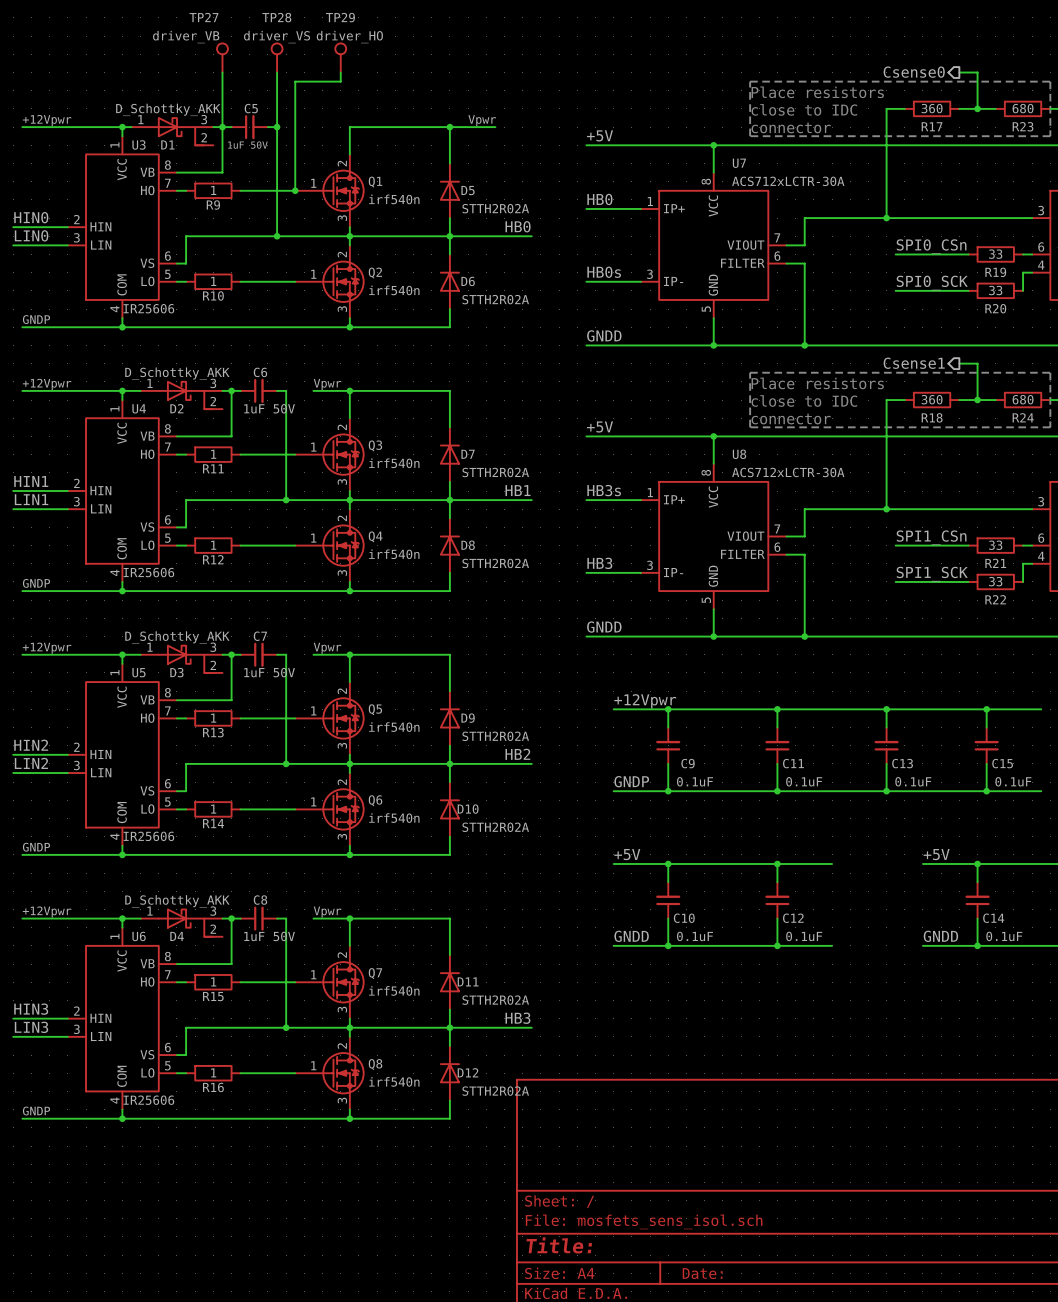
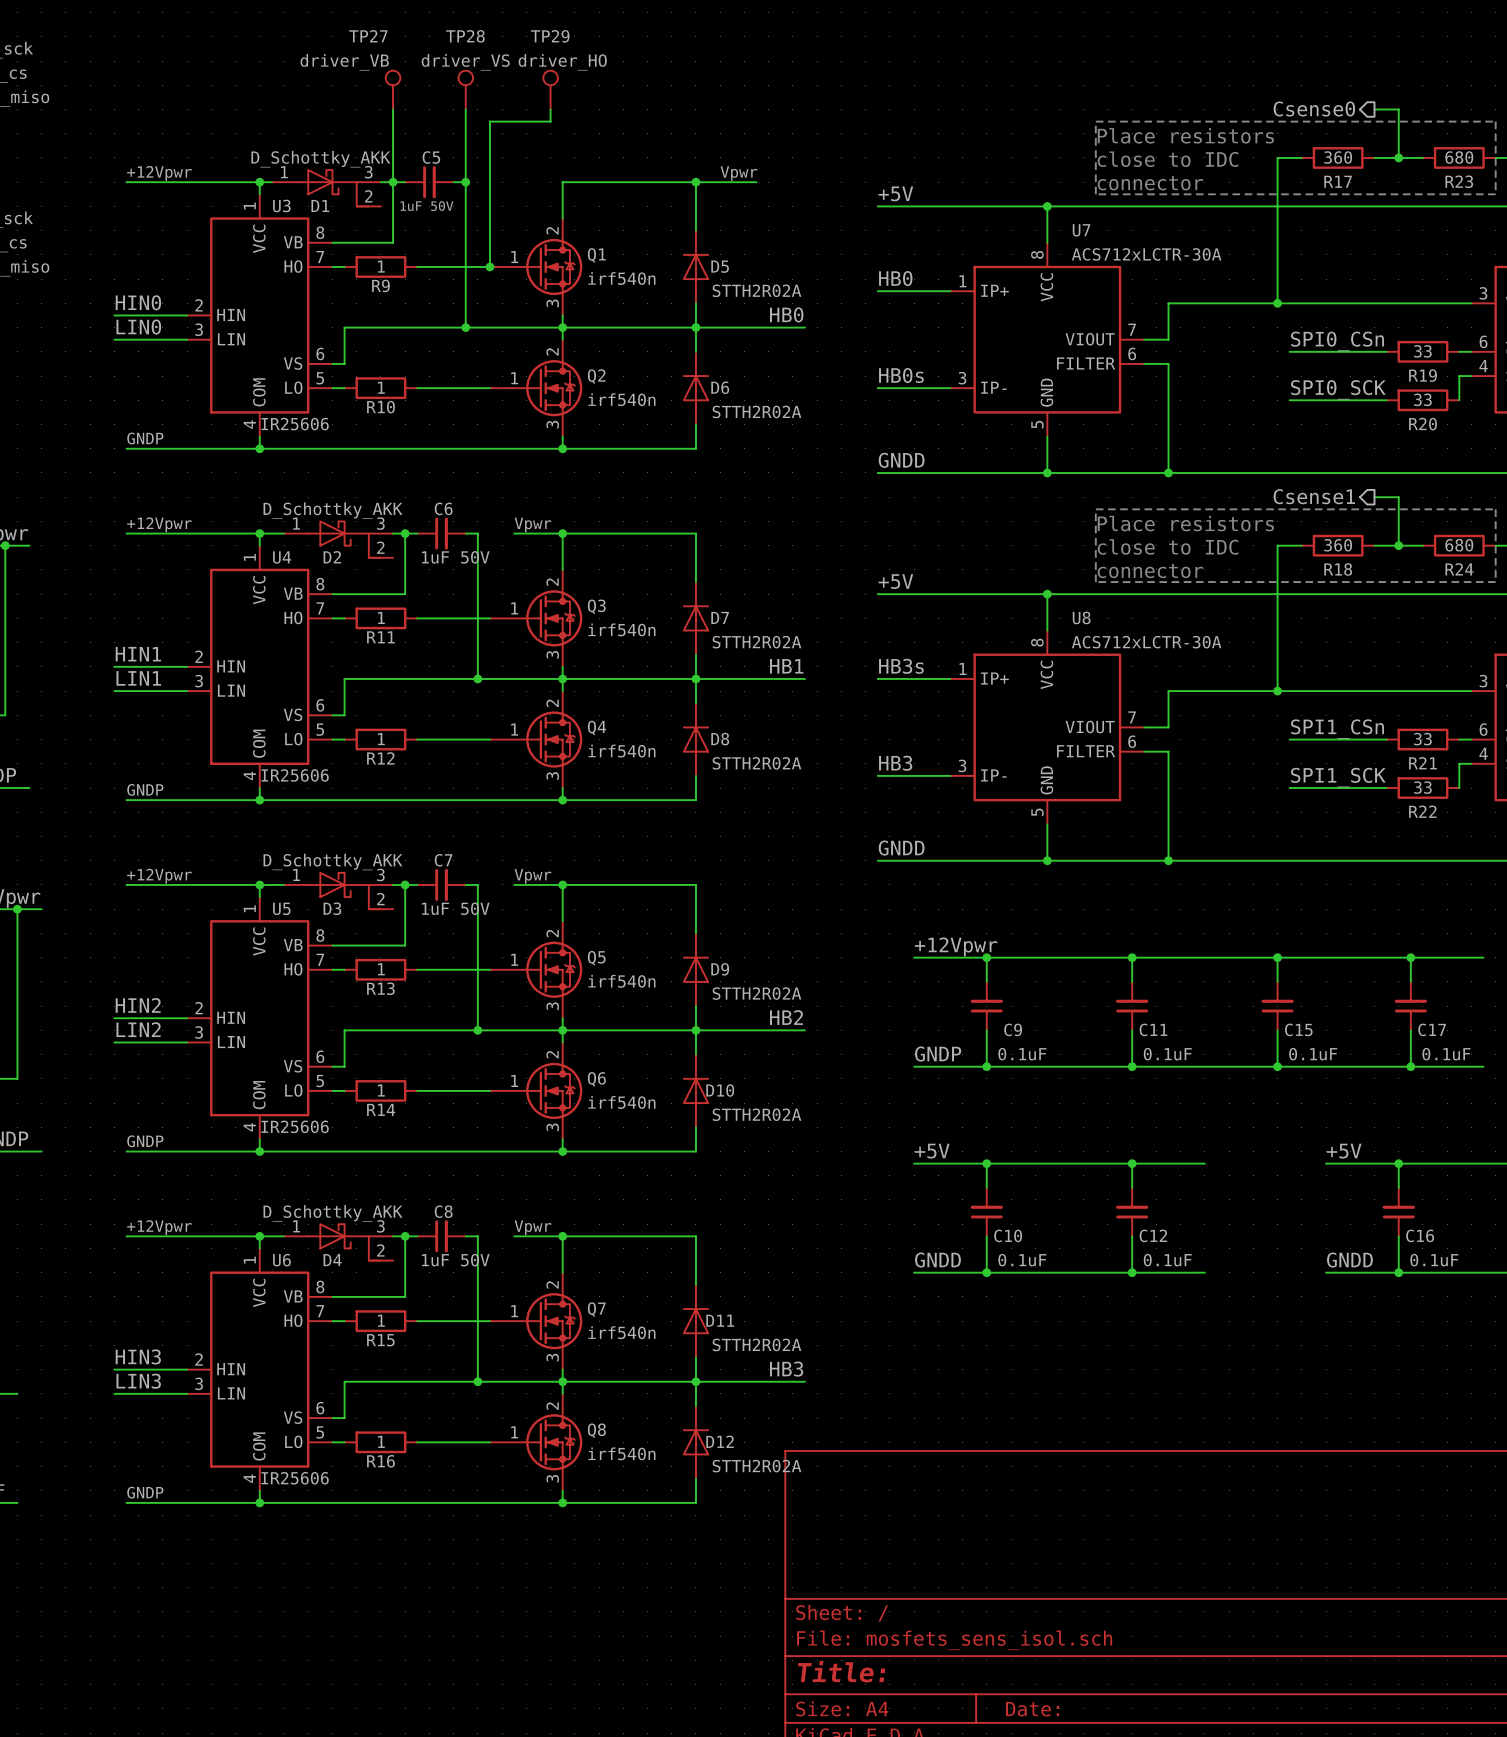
C13 name: C13 (902, 763) -> C15 (1298, 1029)
C15 name: C15 (1002, 763) -> C17 (1432, 1029)
C14 name: C14 (993, 918) -> C16 (1420, 1235)

